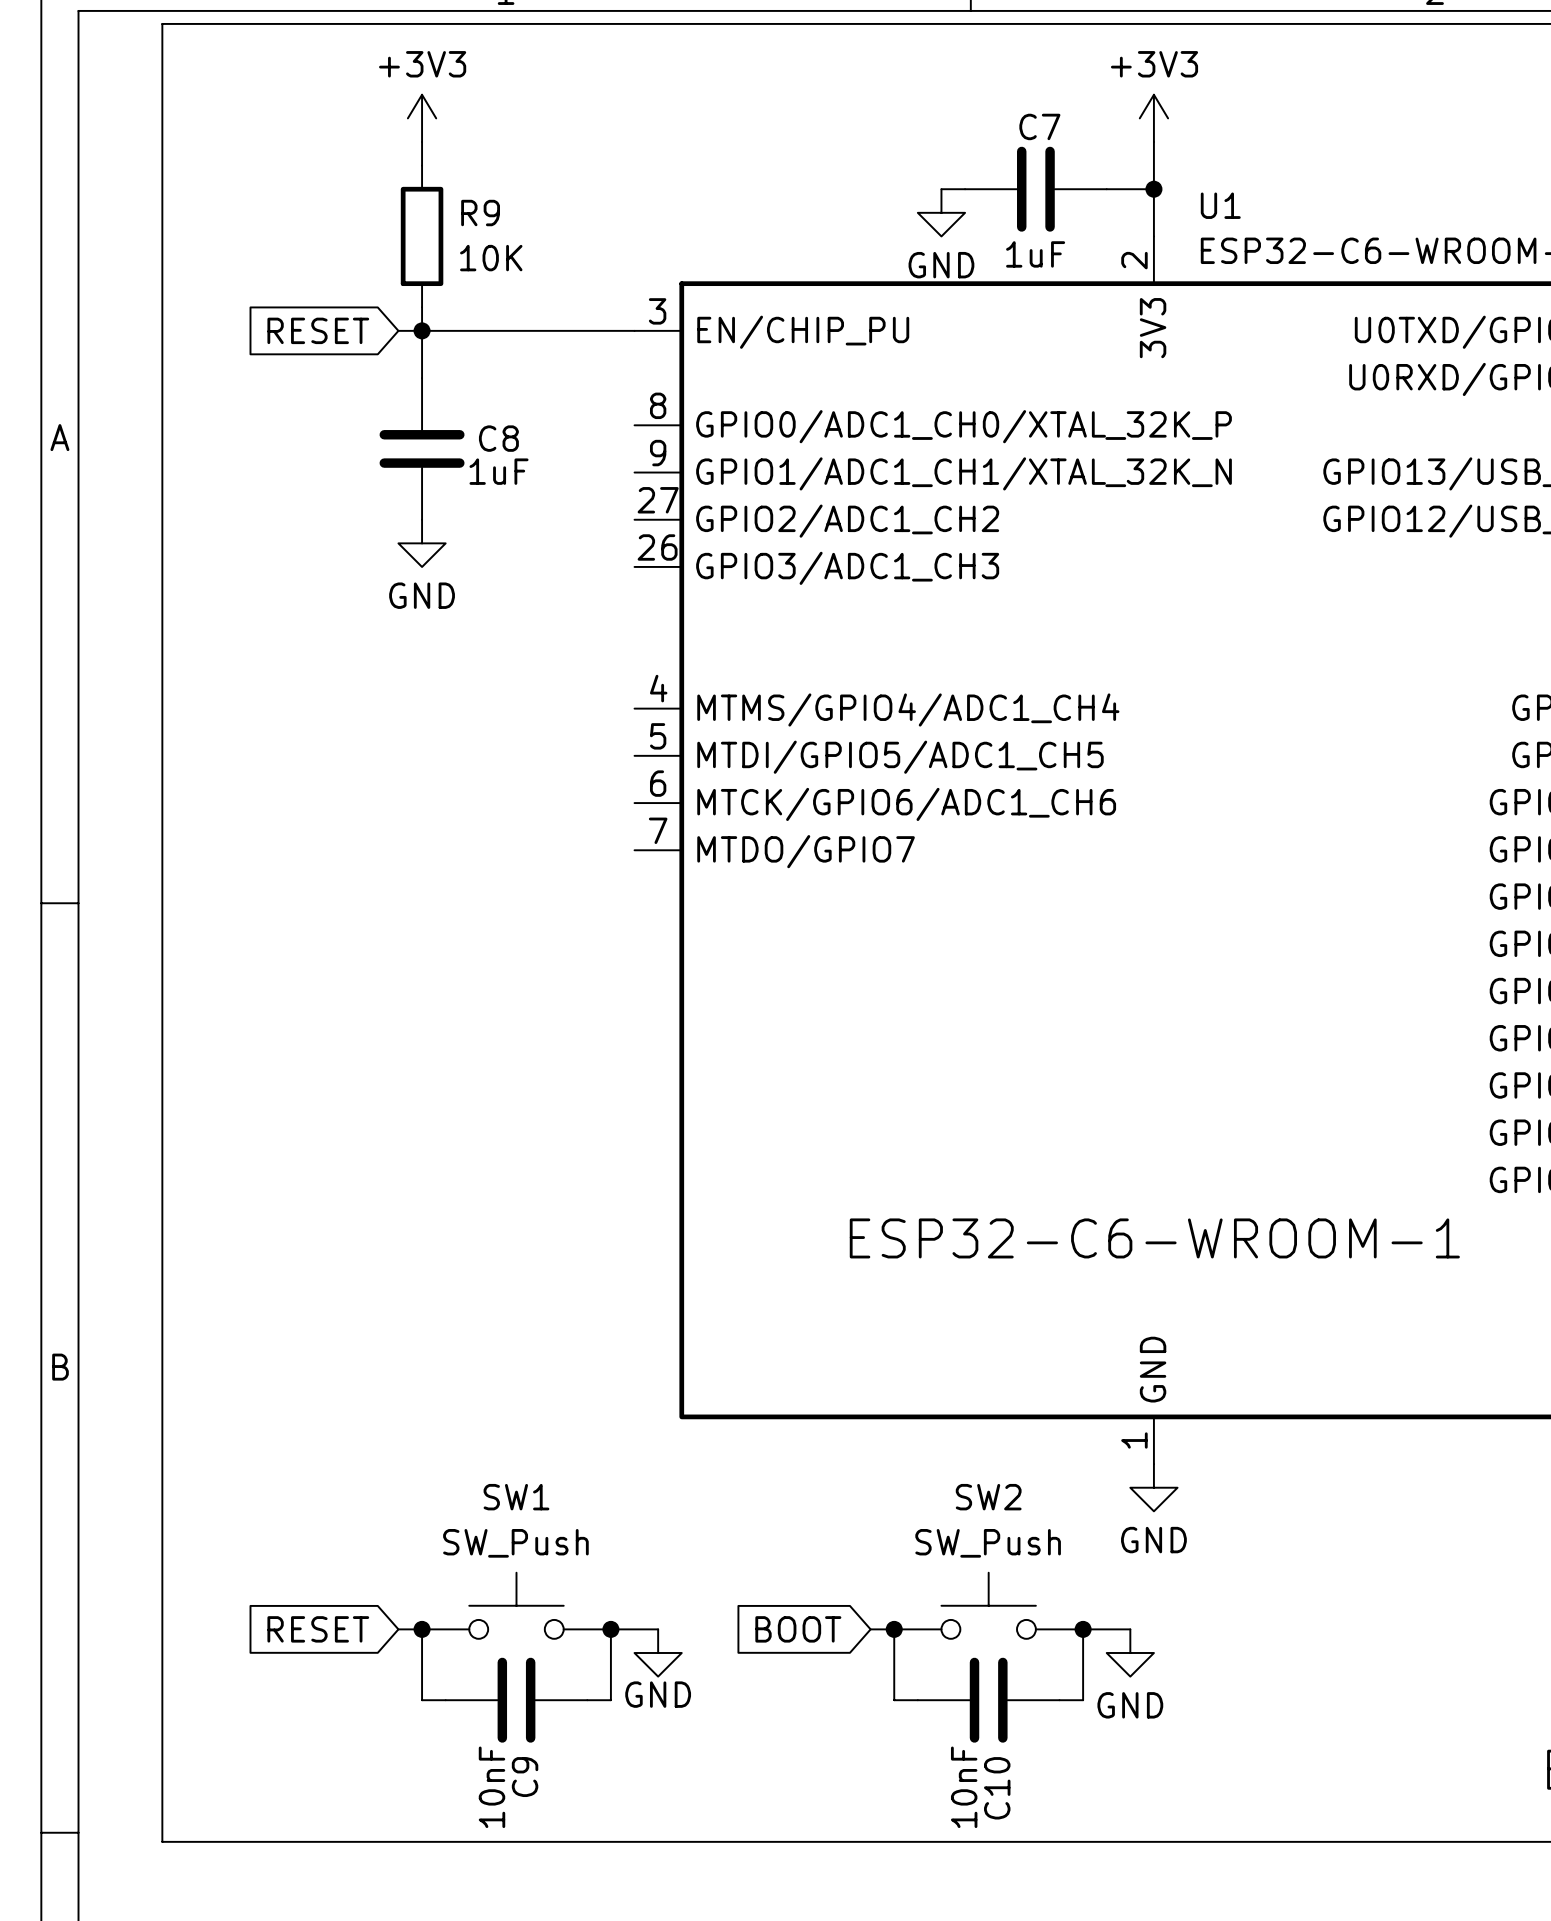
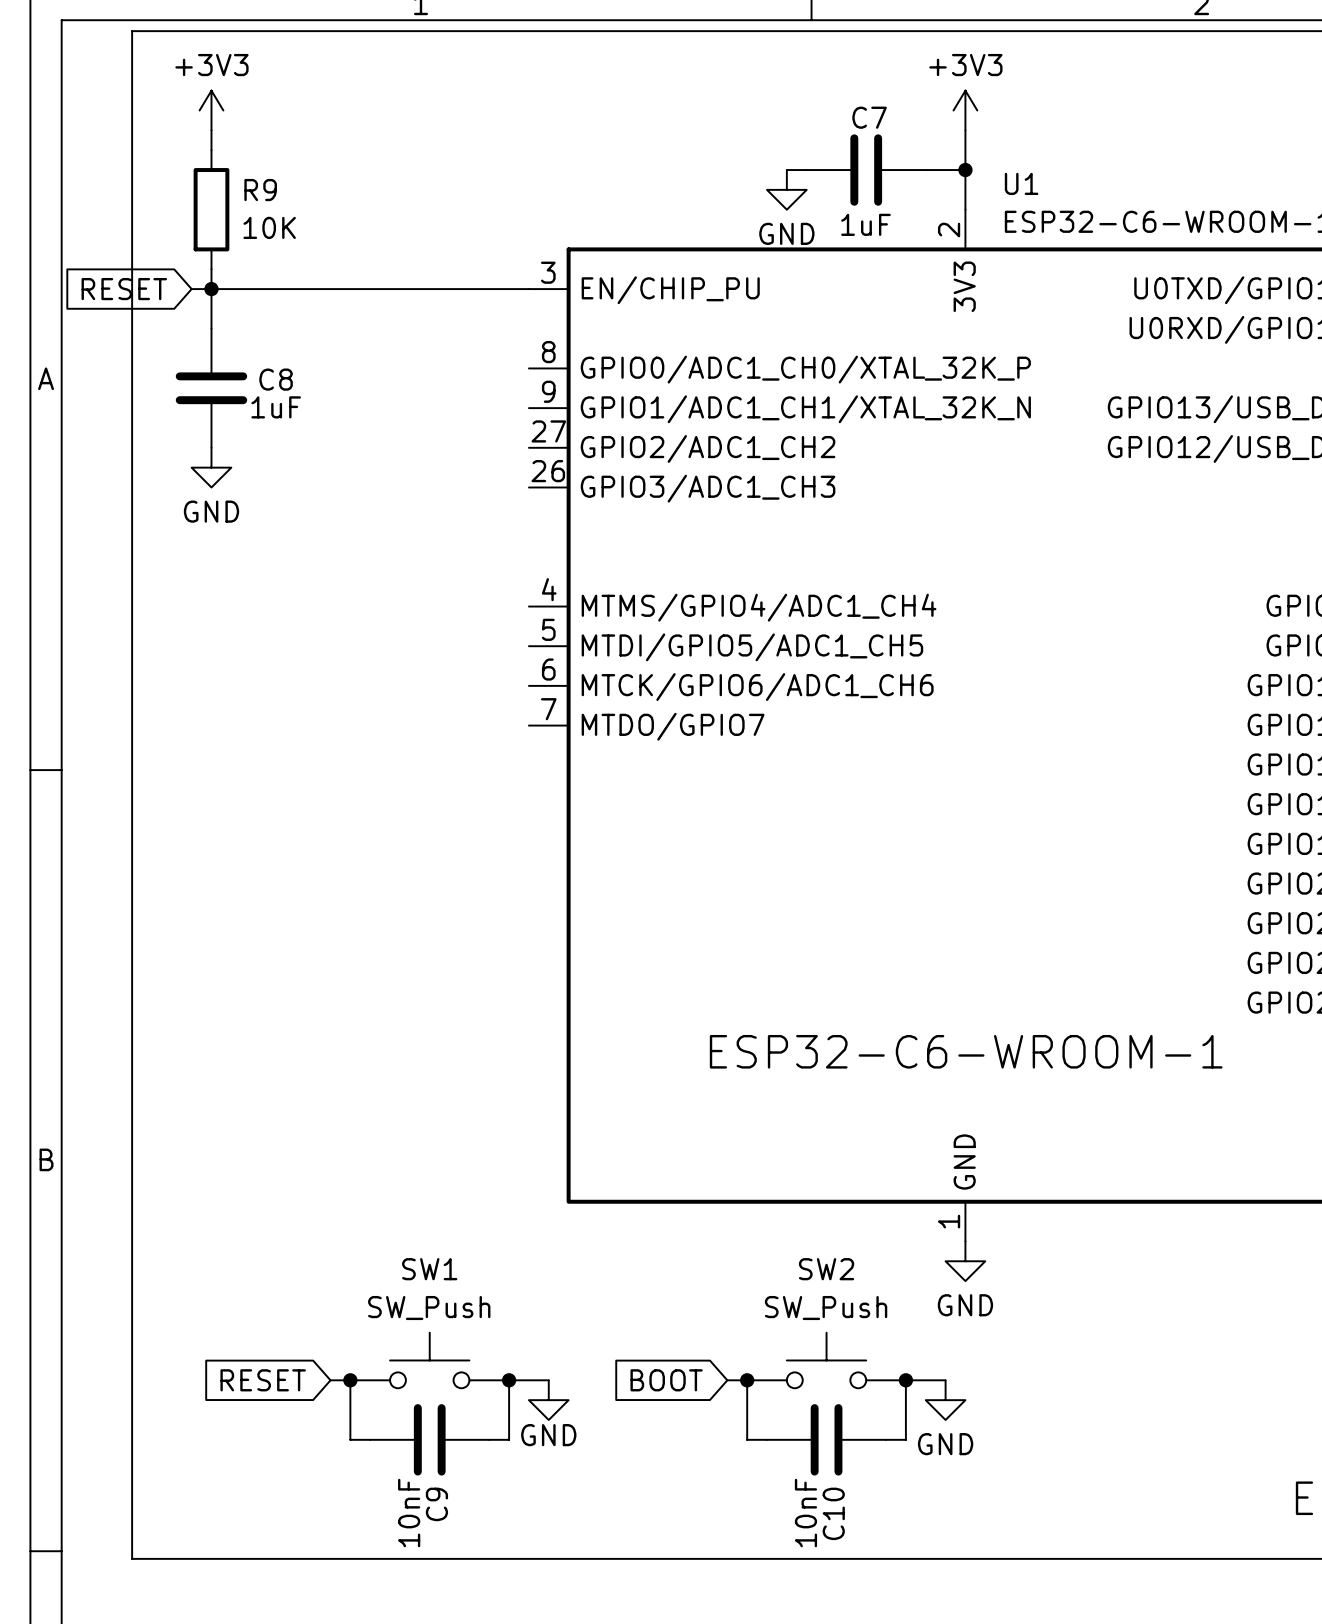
power symbol position: +3V3 (422, 118) -> +3V3 (211, 110)
wire: (422, 142) (422, 165) -> (211, 130) (211, 150)
R9 position: (422, 236) -> (211, 209)
wire: (422, 307) (422, 378) -> (211, 269) (211, 328)
wire: none -> (191, 289) (330, 289)
junction: none -> (211, 289)
global label position: RESET (318, 330) -> RESET (124, 289)
junction: (422, 330) -> none
C8 position: (422, 448) -> (211, 388)
power symbol position: GND (422, 543) -> GND (211, 467)

